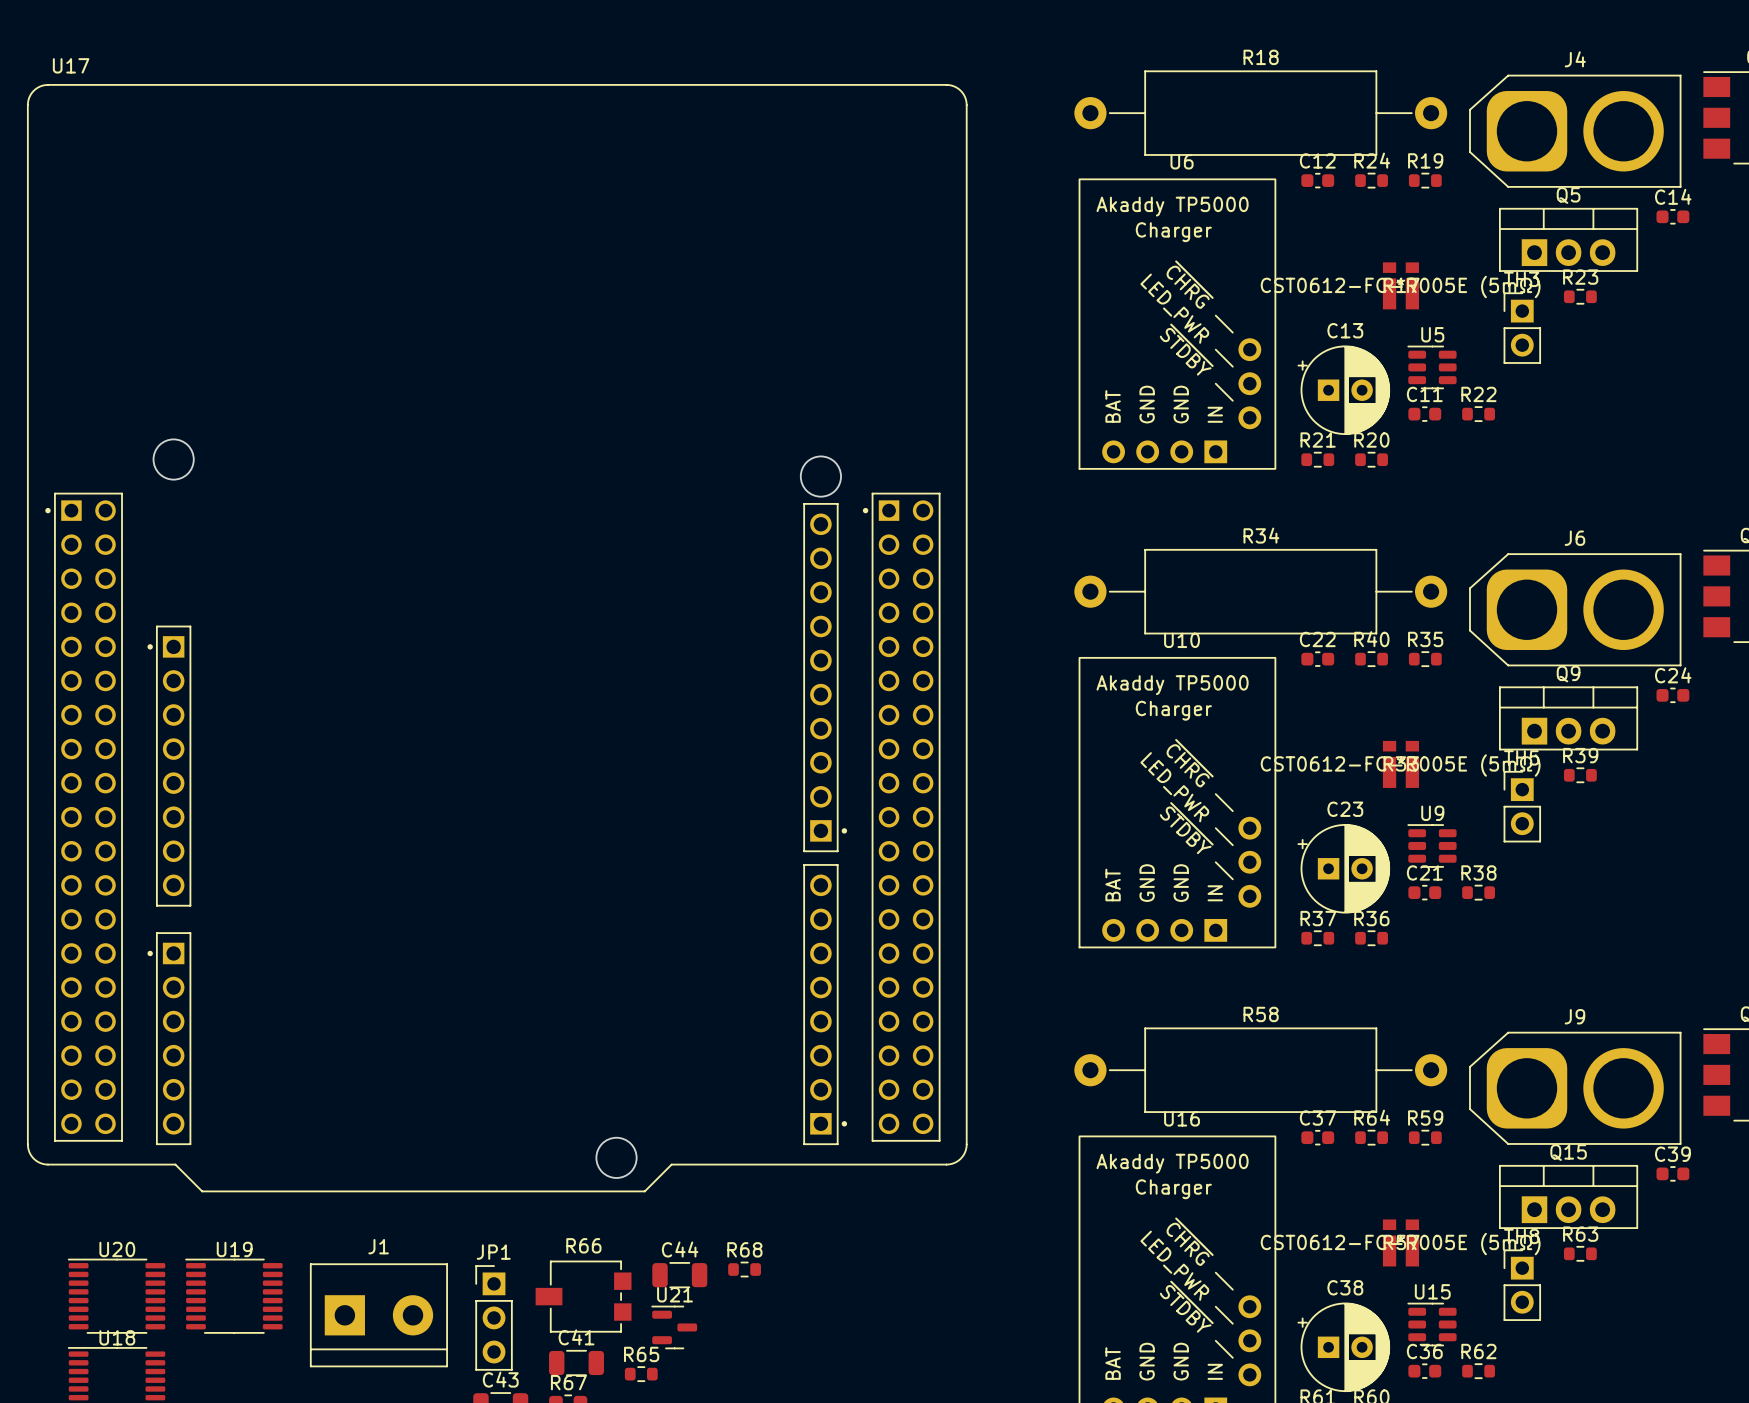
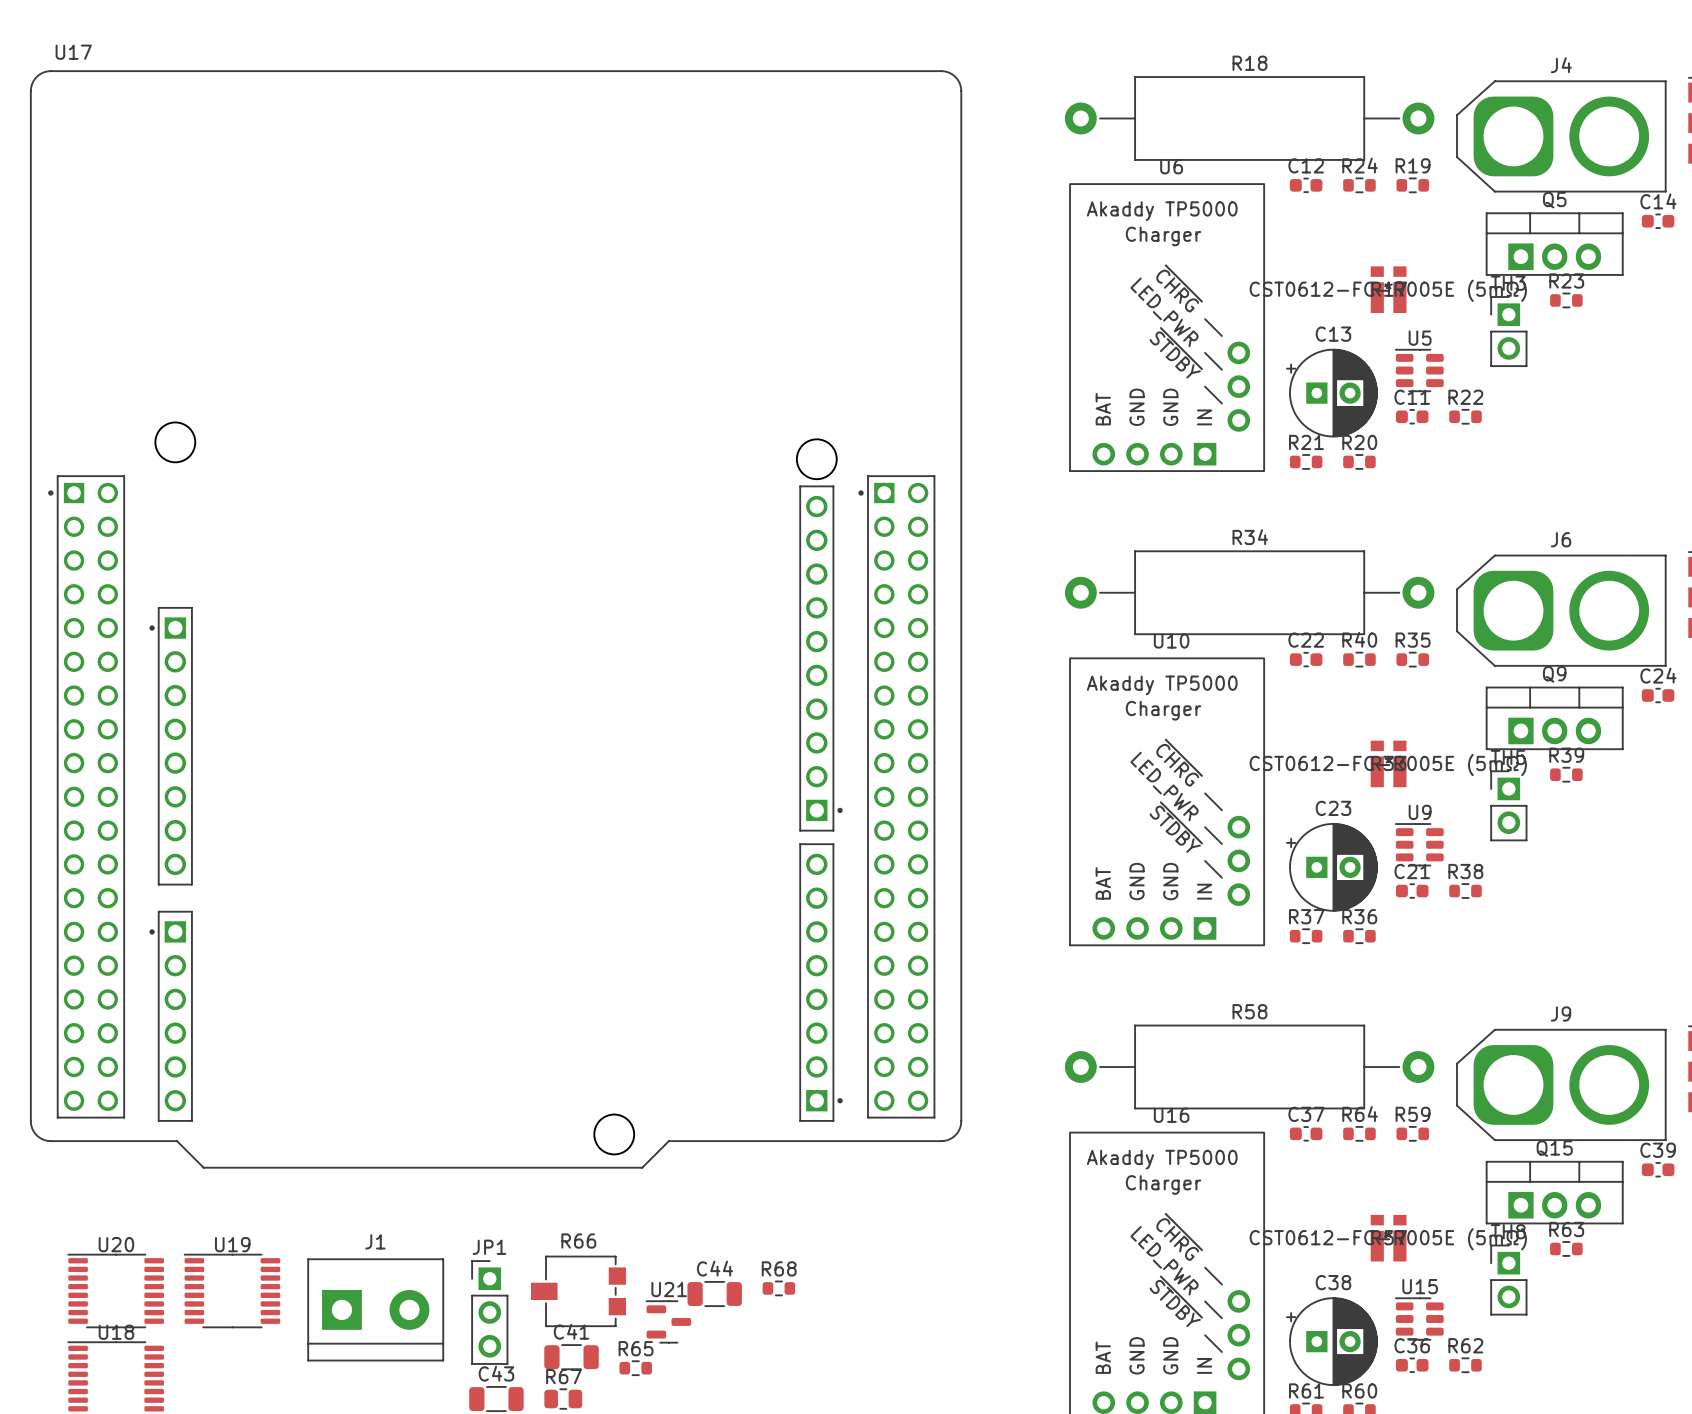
U17 position: (497, 638) -> (496, 619)
R68 position: (744, 1269) -> (778, 1288)
C44 position: (679, 1275) -> (714, 1294)

